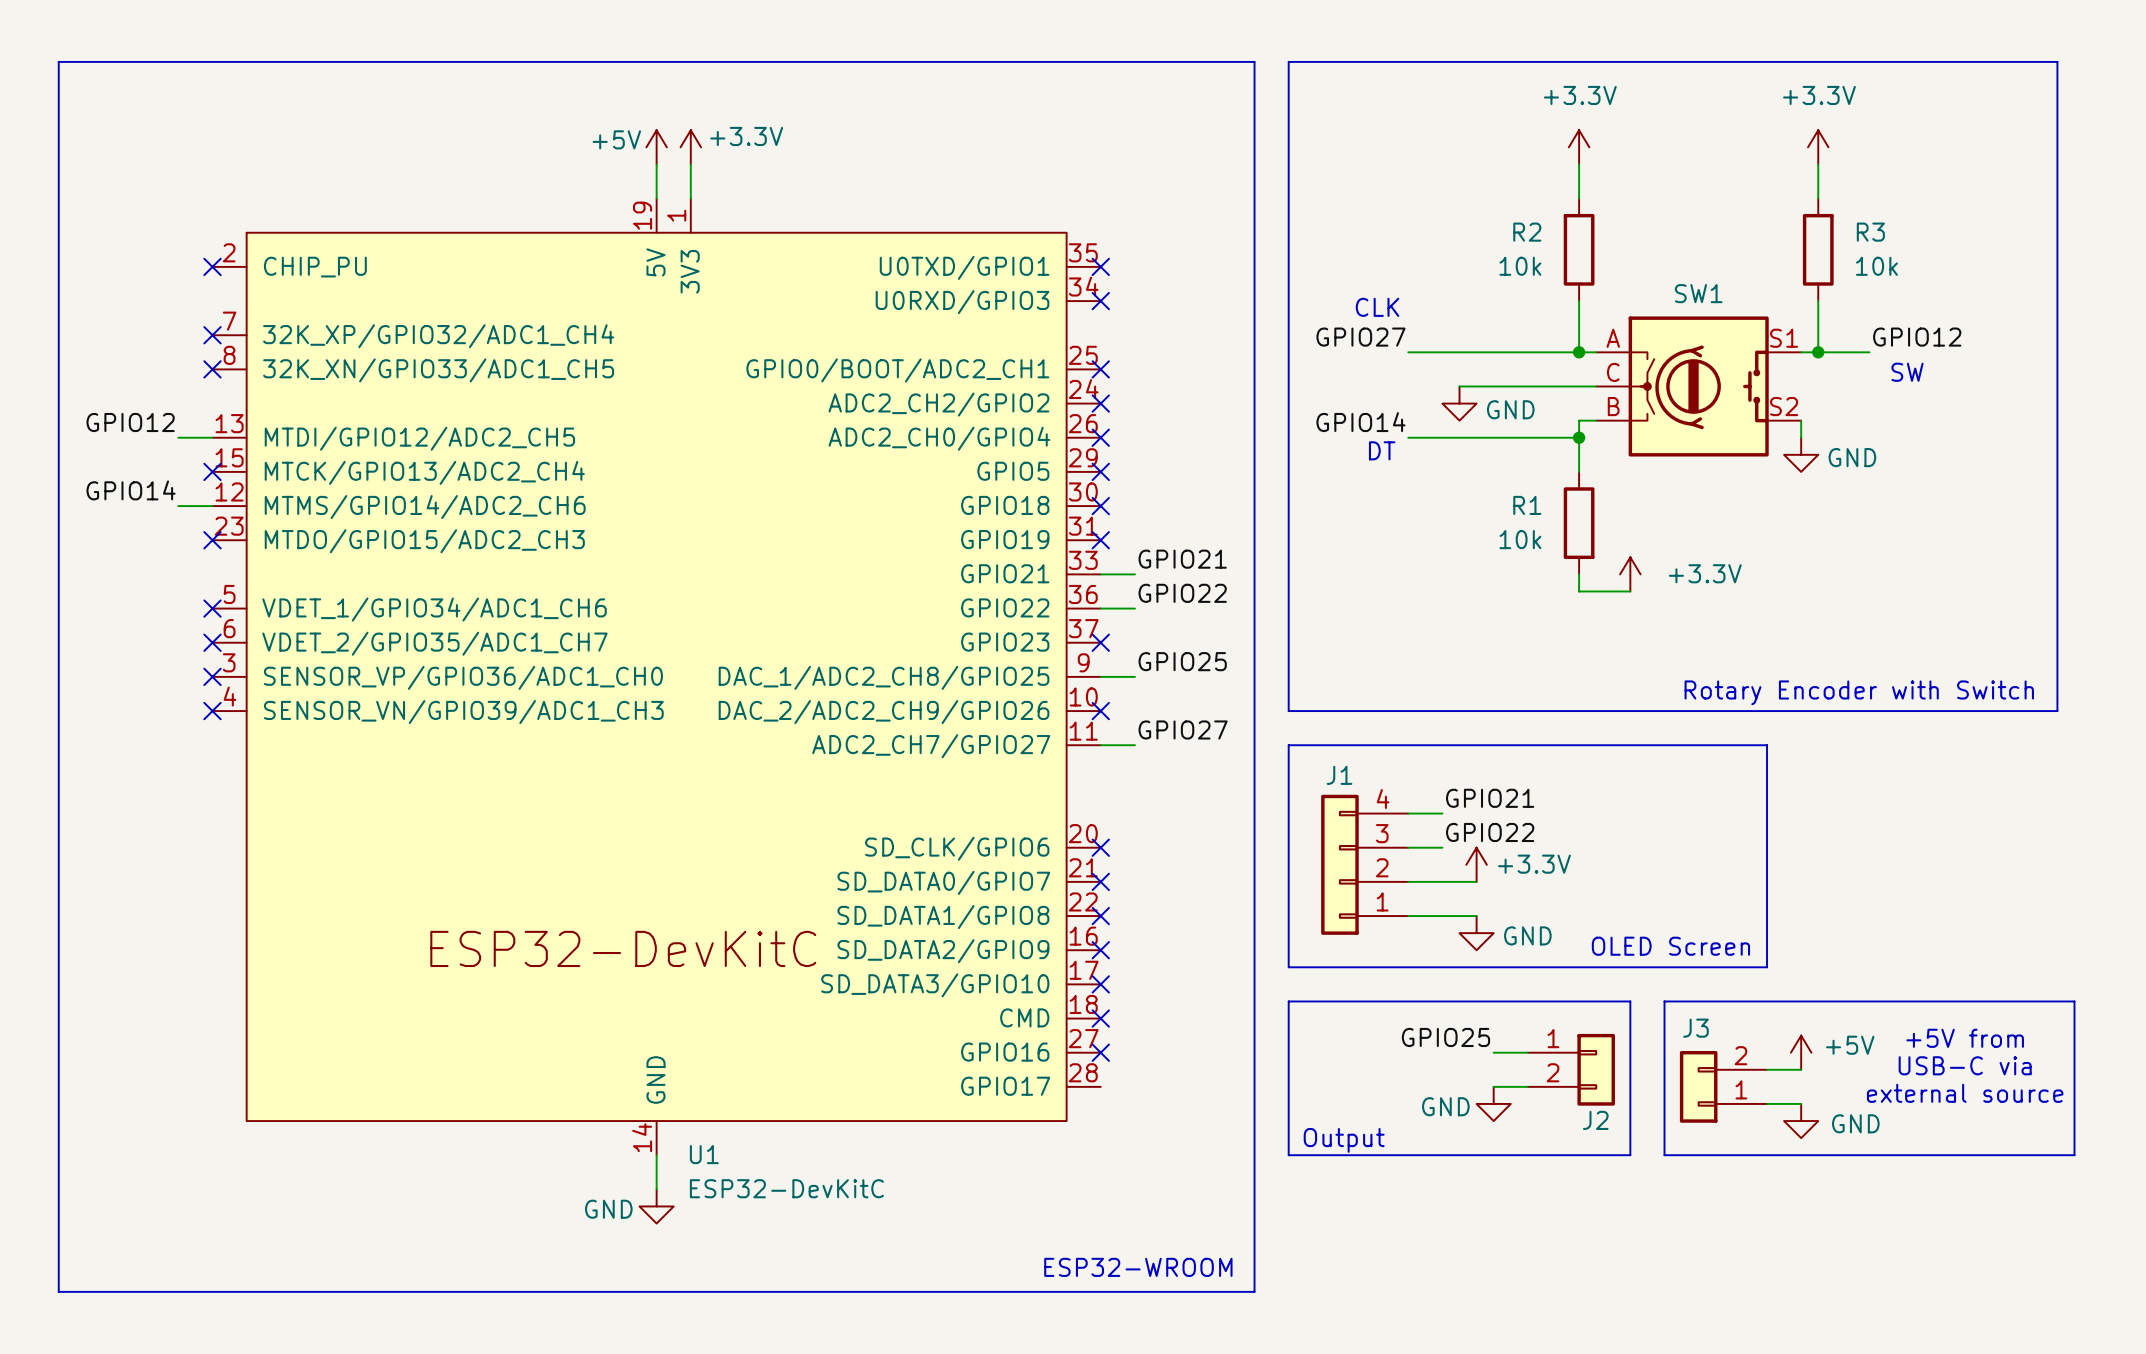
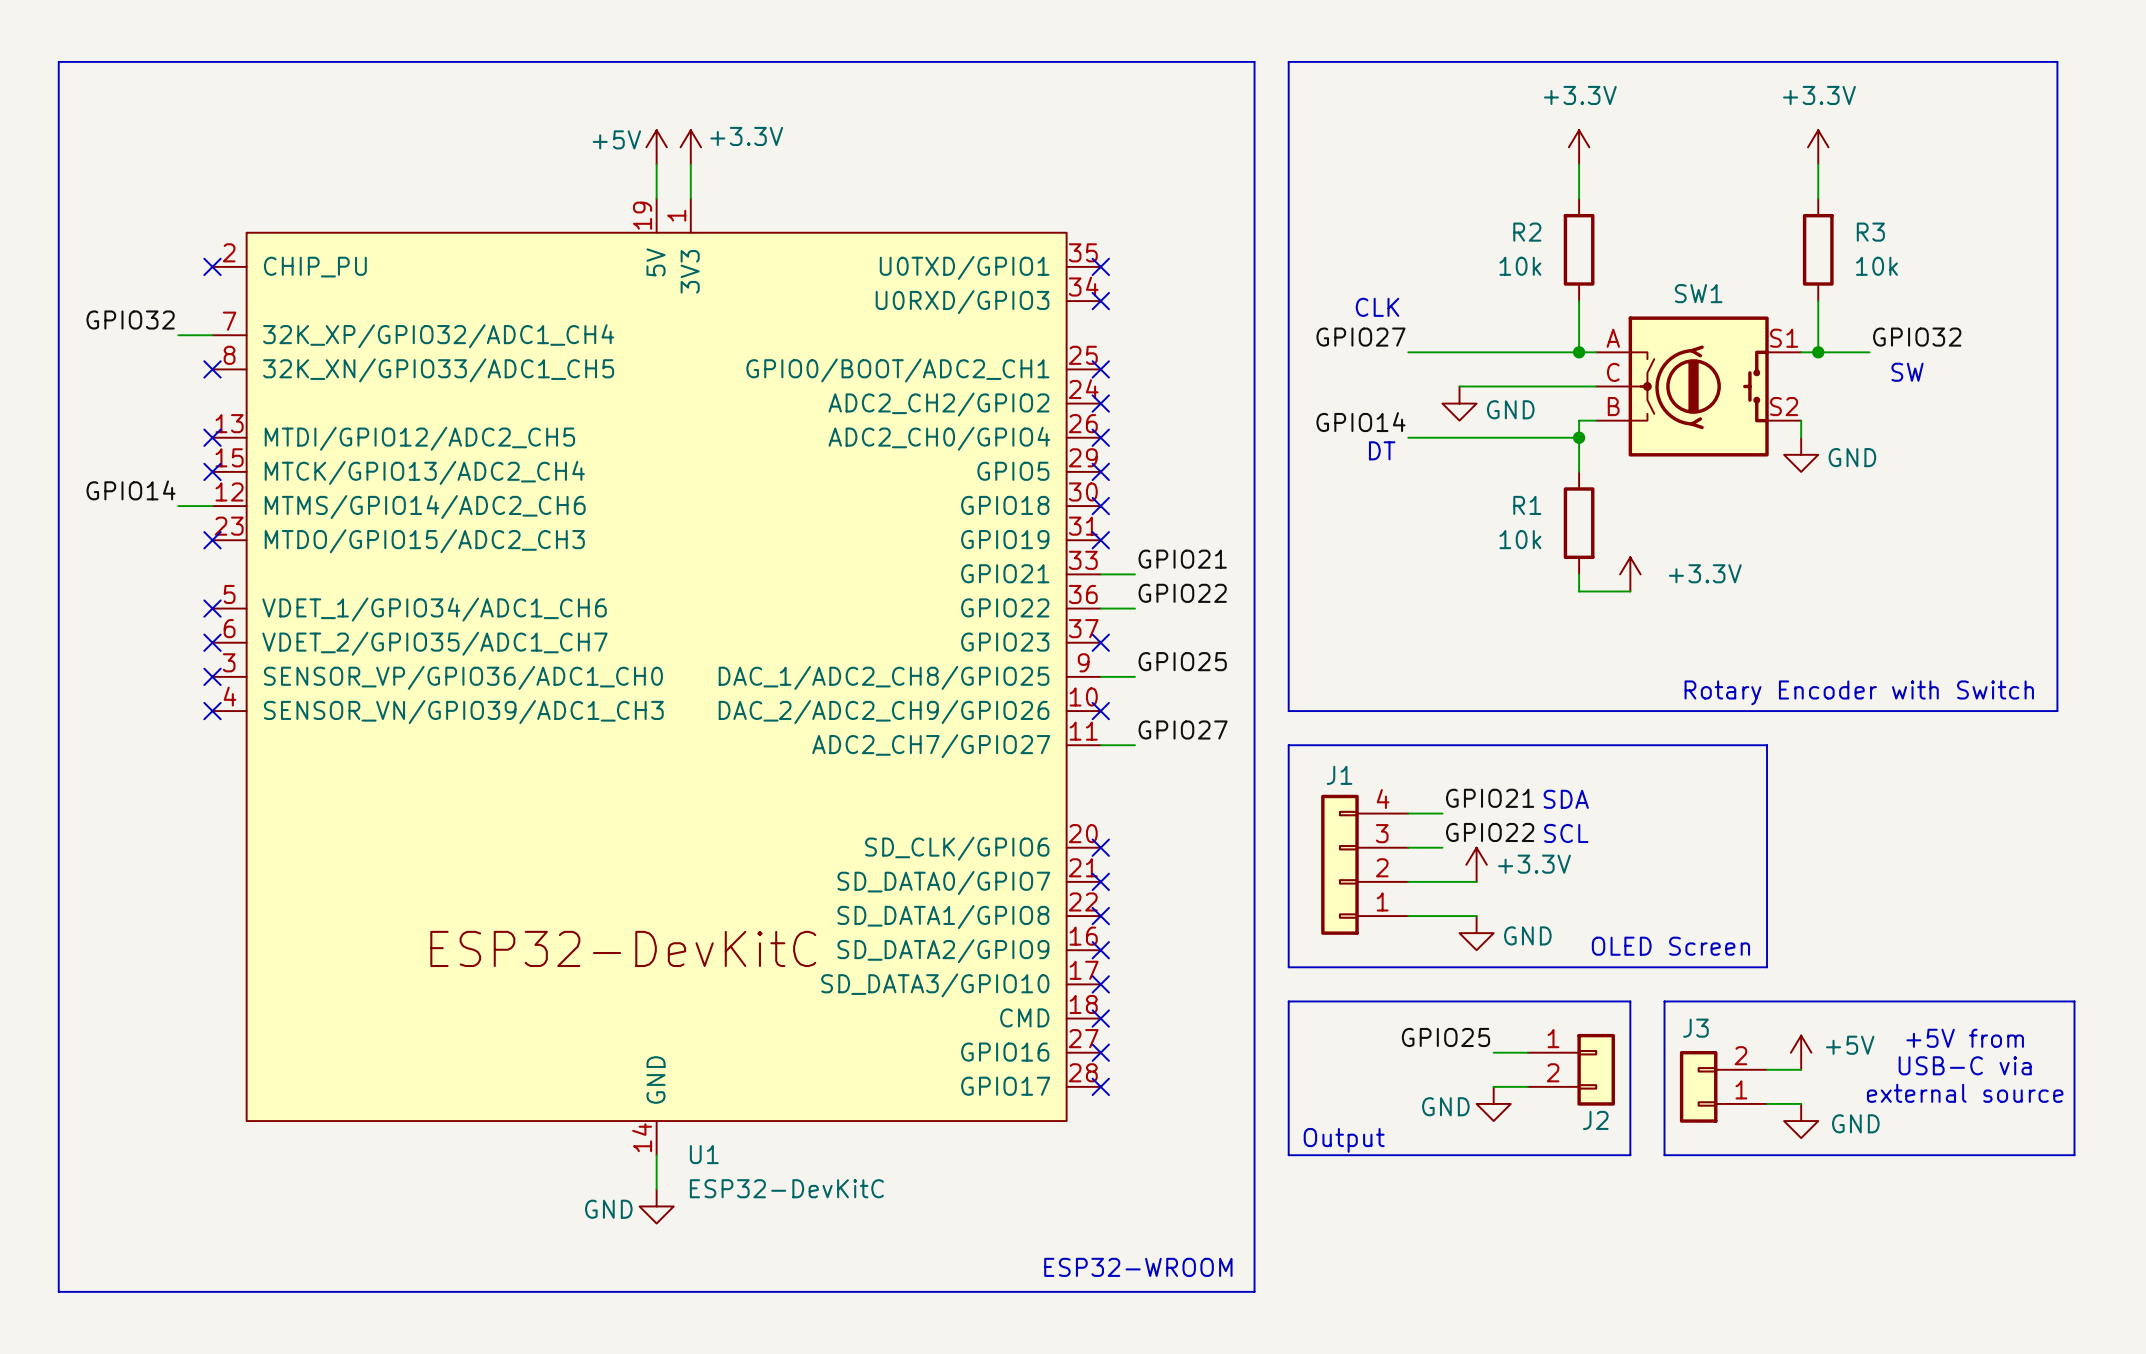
label: none -> GPIO32 (130, 320)
no-connect mark: (212, 335) -> none
label: GPIO12 (1917, 337) -> GPIO32 (1917, 337)
label: GPIO12 (130, 422) -> none
wire: (178, 437) (212, 437) -> (178, 335) (212, 335)
no-connect mark: none -> (212, 437)
text: none -> SDA (1566, 799)
text: none -> SCL (1566, 833)
no-connect mark: none -> (1100, 1086)

